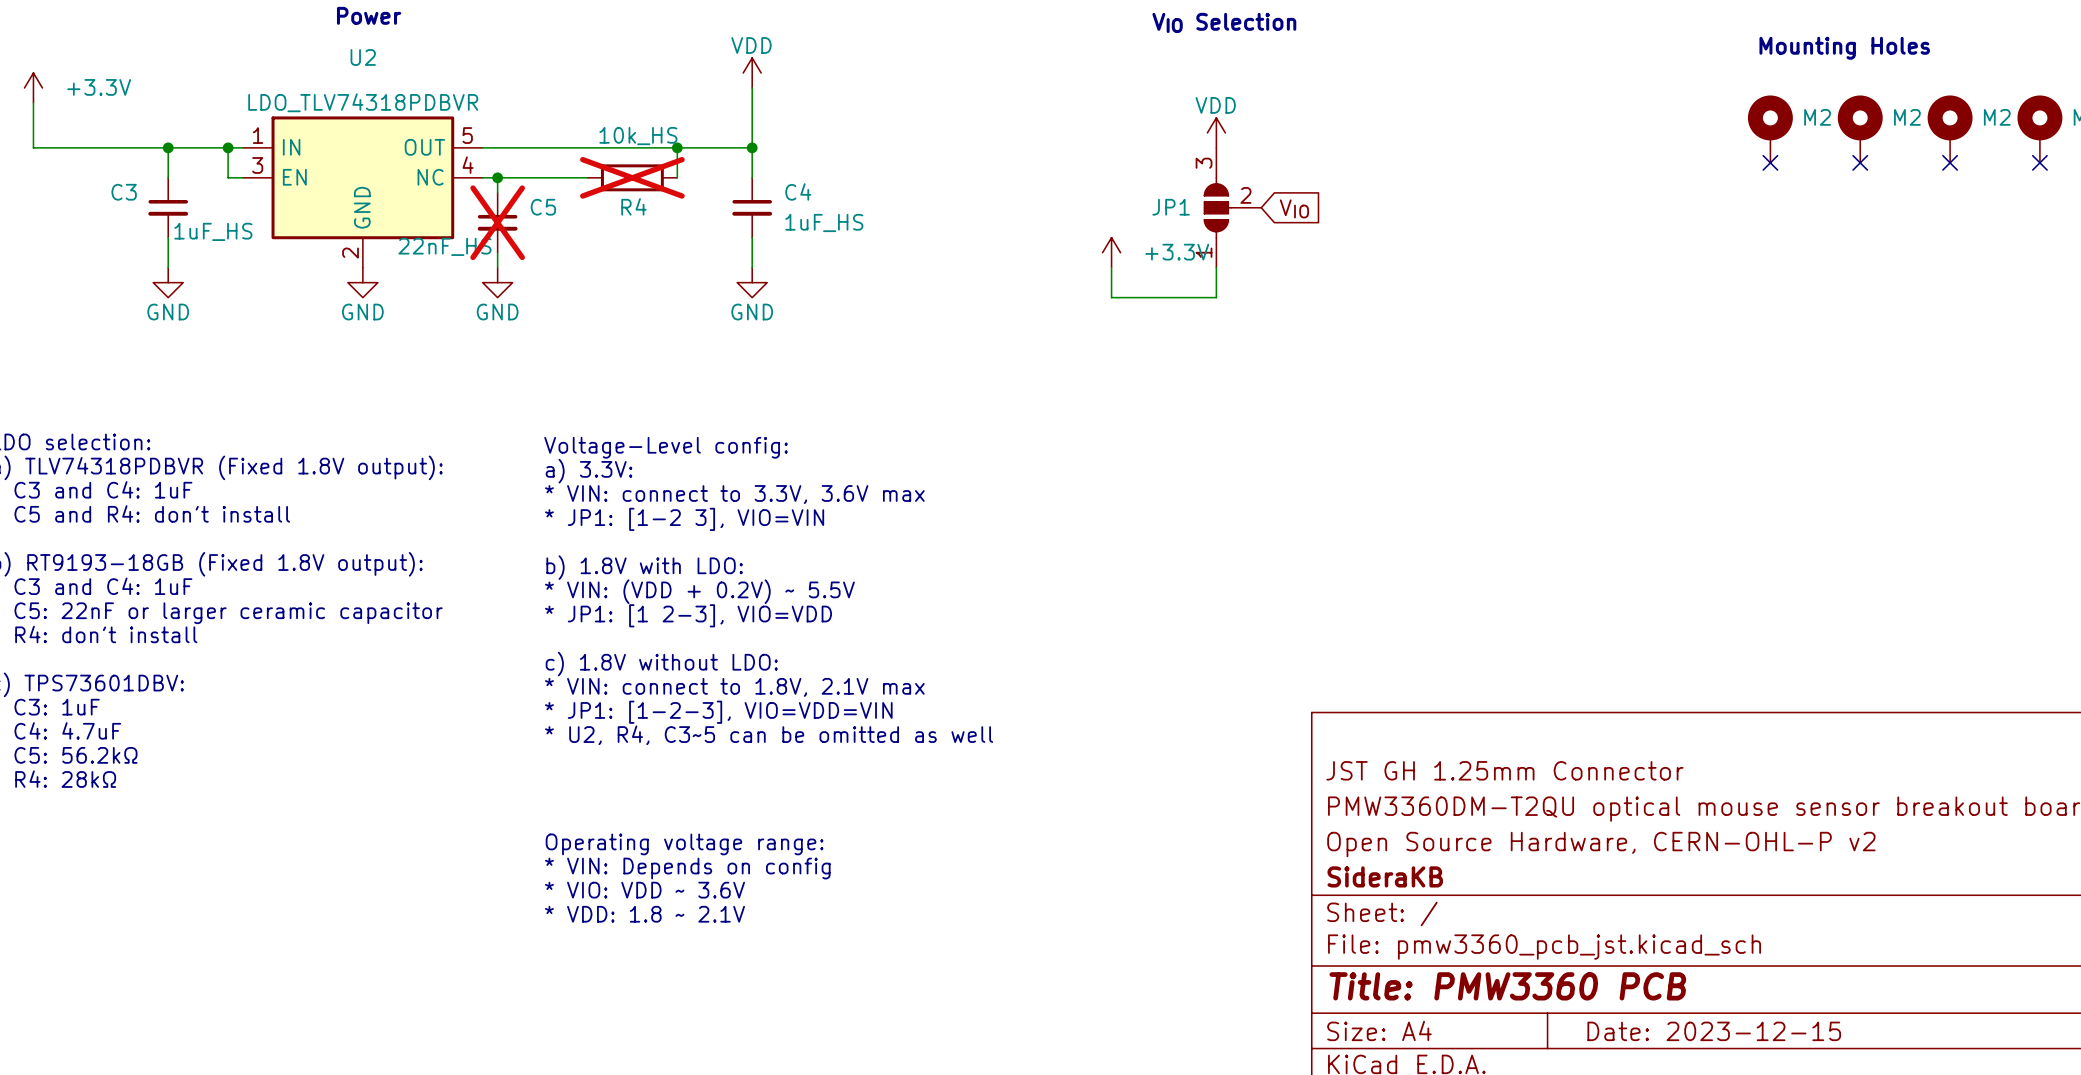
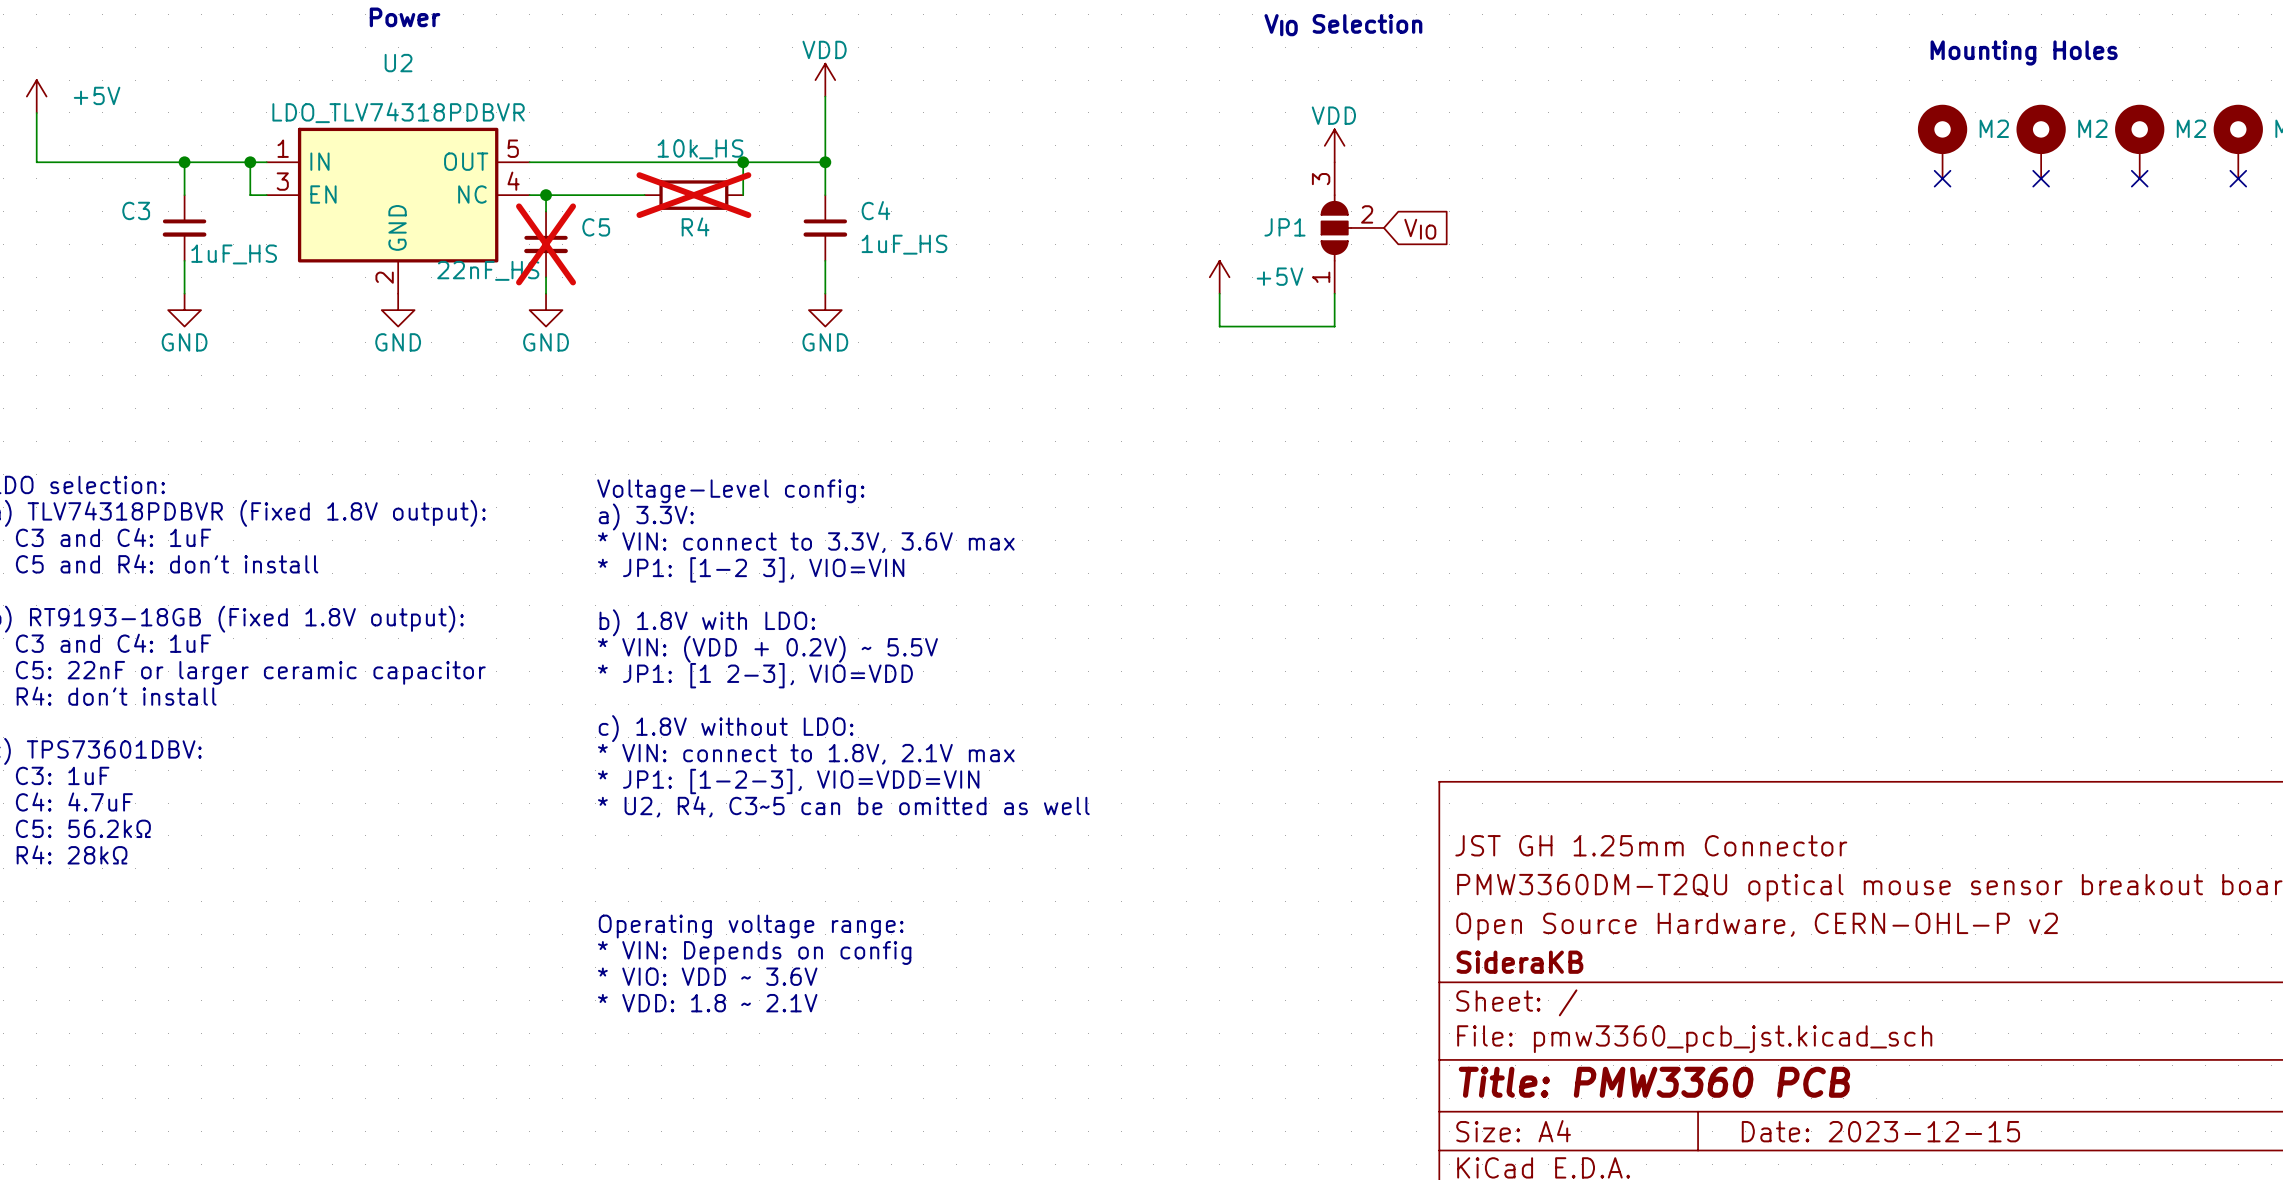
power symbol: +3.3V (33, 87) -> +5V (36, 96)
power symbol: +3.3V (1111, 252) -> +5V (1219, 277)

